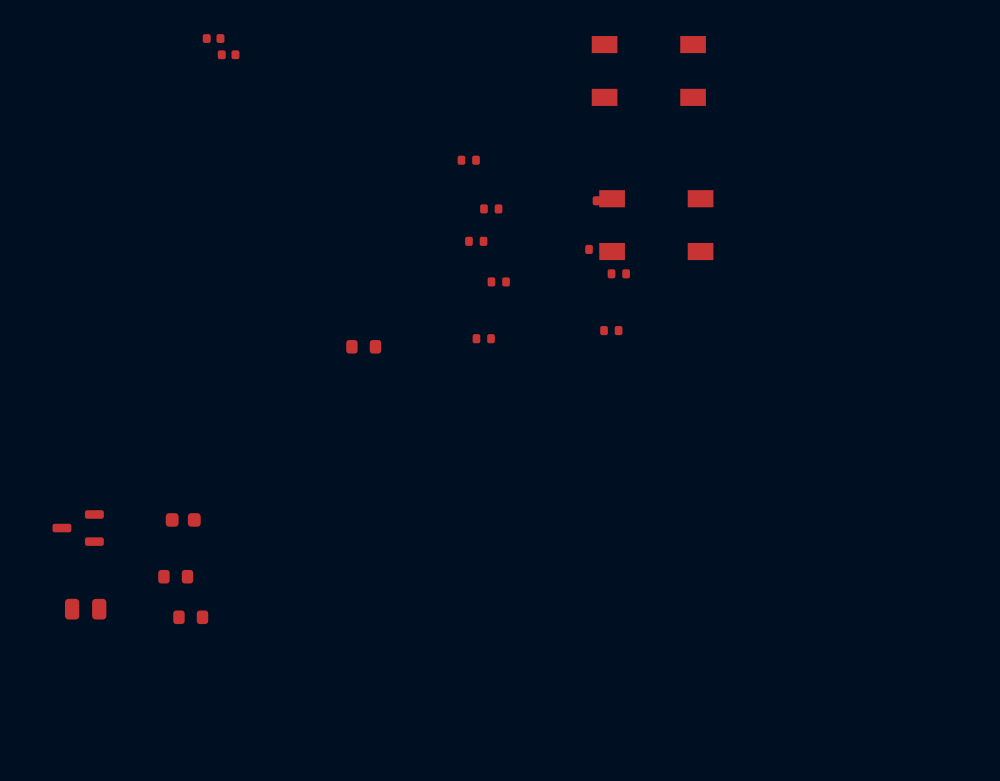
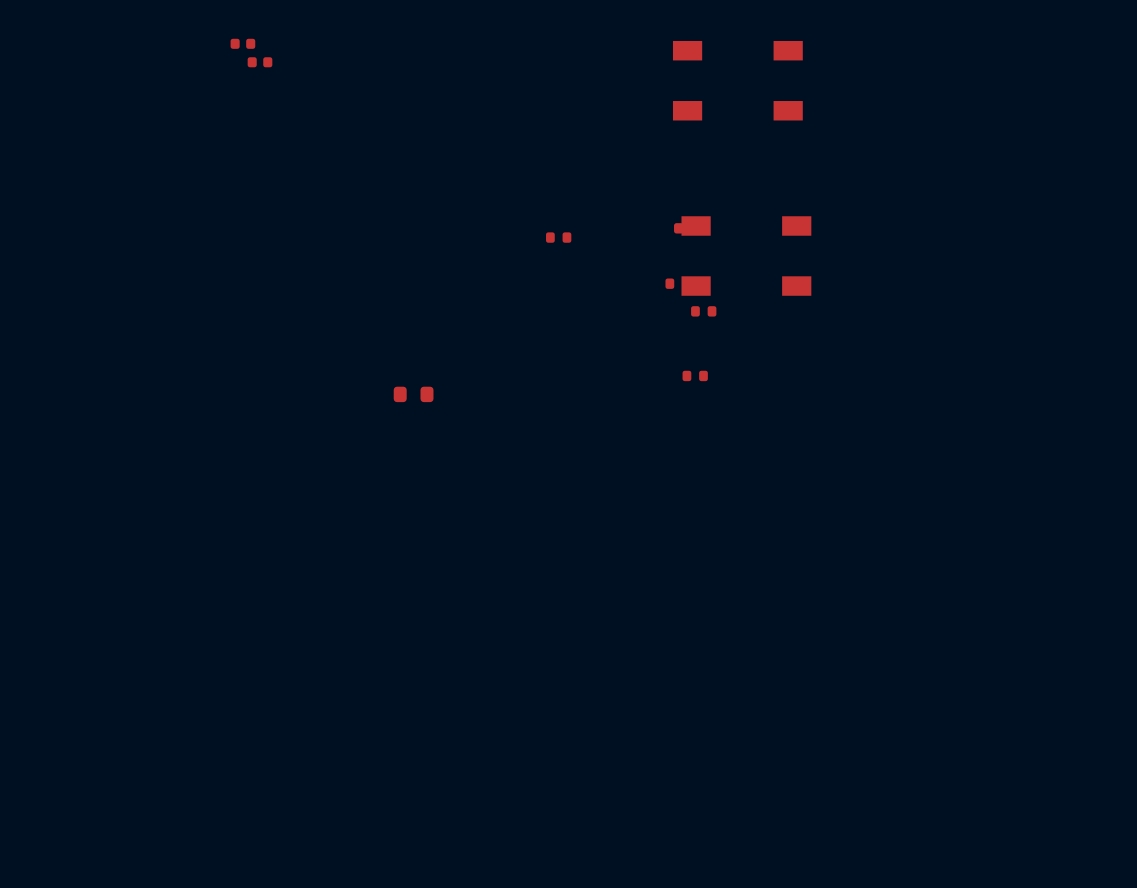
part: (468, 160) -> none
part: (476, 241) -> none
part: (498, 281) -> none
part: (483, 338) -> none
part: (183, 519) -> none
part: (78, 528) -> none
part: (175, 576) -> none
part: (85, 609) -> none
part: (190, 617) -> none

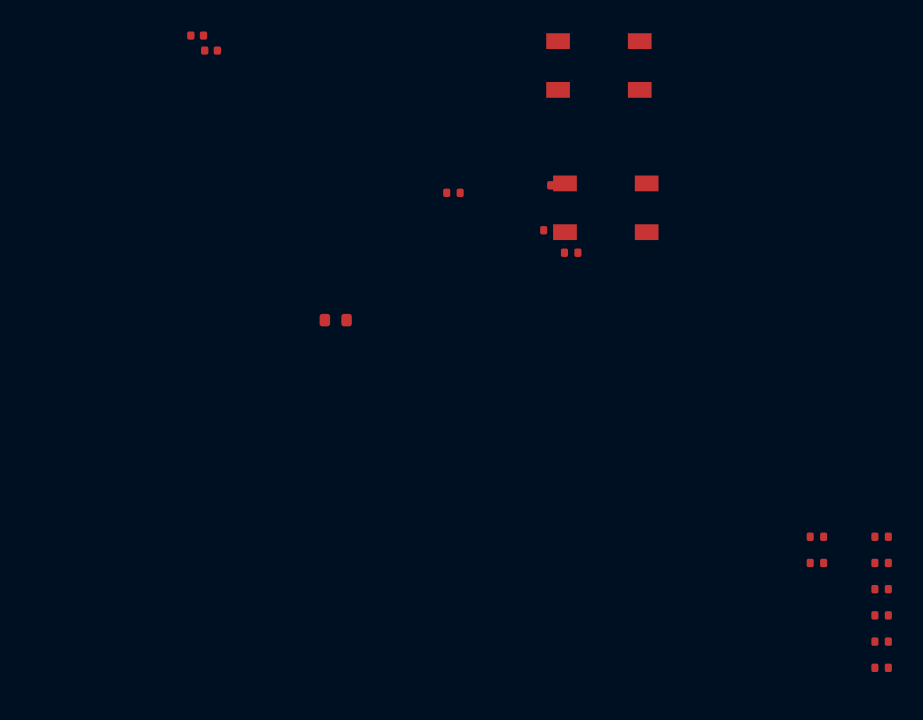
part: (695, 375) -> none
part: none -> (816, 536)
part: none -> (881, 536)
part: none -> (816, 562)
part: none -> (881, 562)
part: none -> (881, 589)
part: none -> (881, 615)
part: none -> (881, 641)
part: none -> (881, 667)

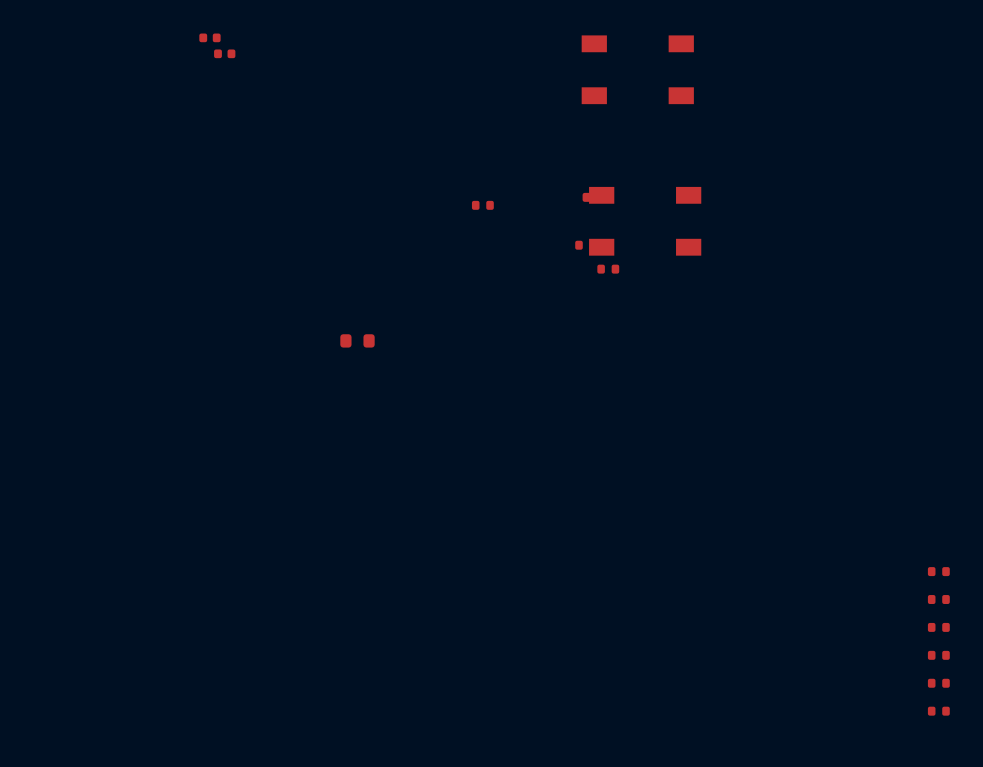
part: (816, 536) -> none
part: (816, 562) -> none

